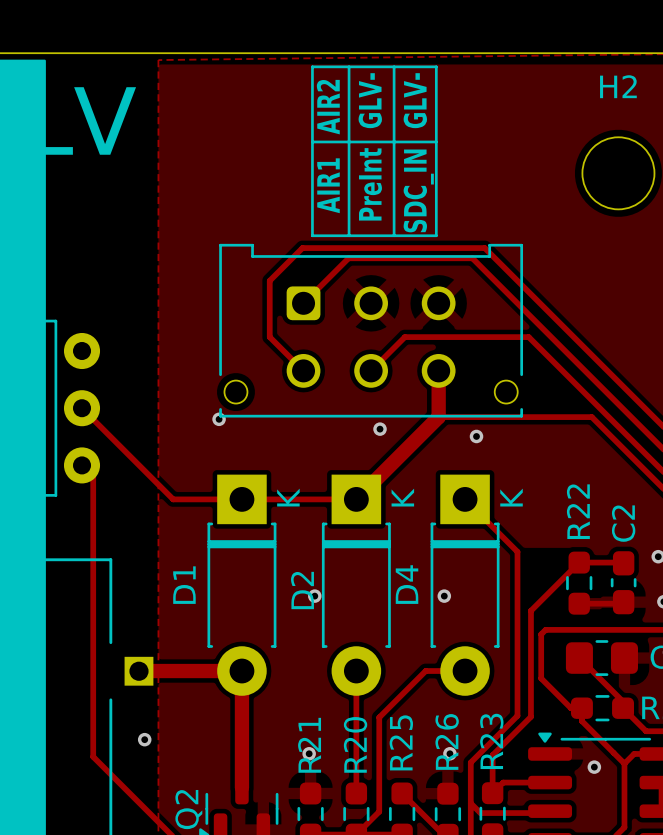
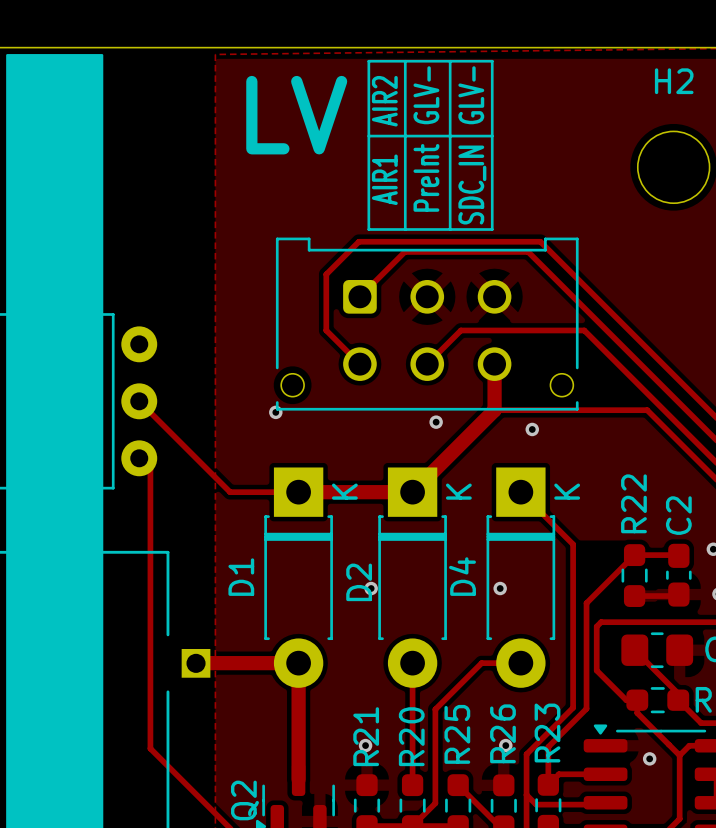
track width: thin (241, 499) (356, 499) -> thick (298, 492) (412, 492)
via: (144, 739) -> none

